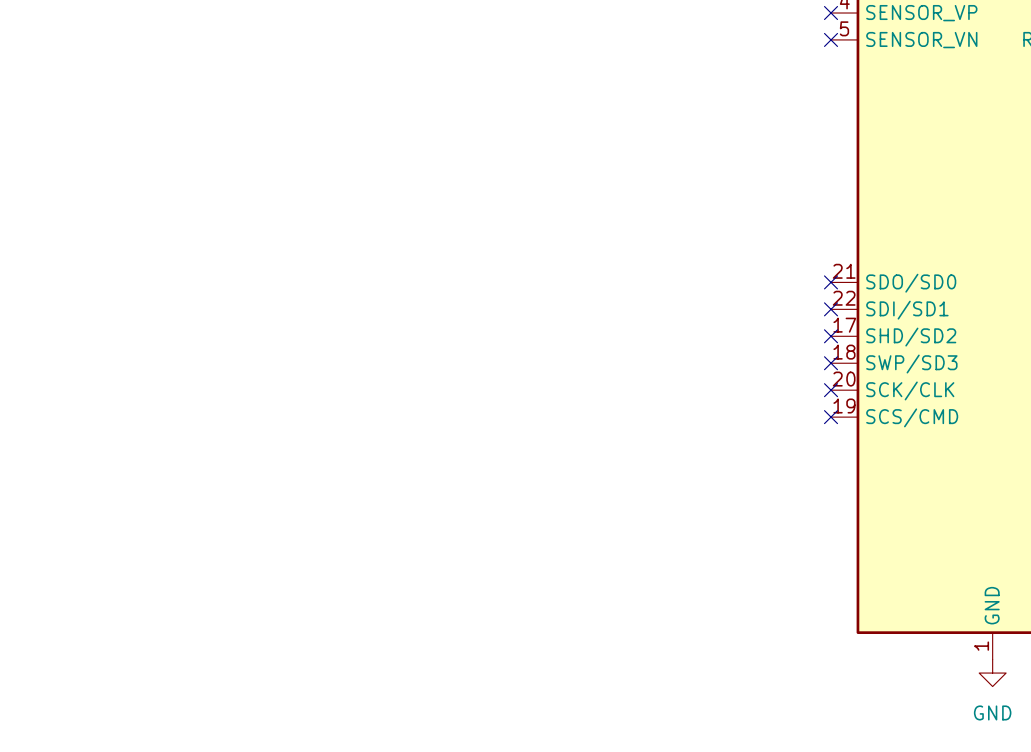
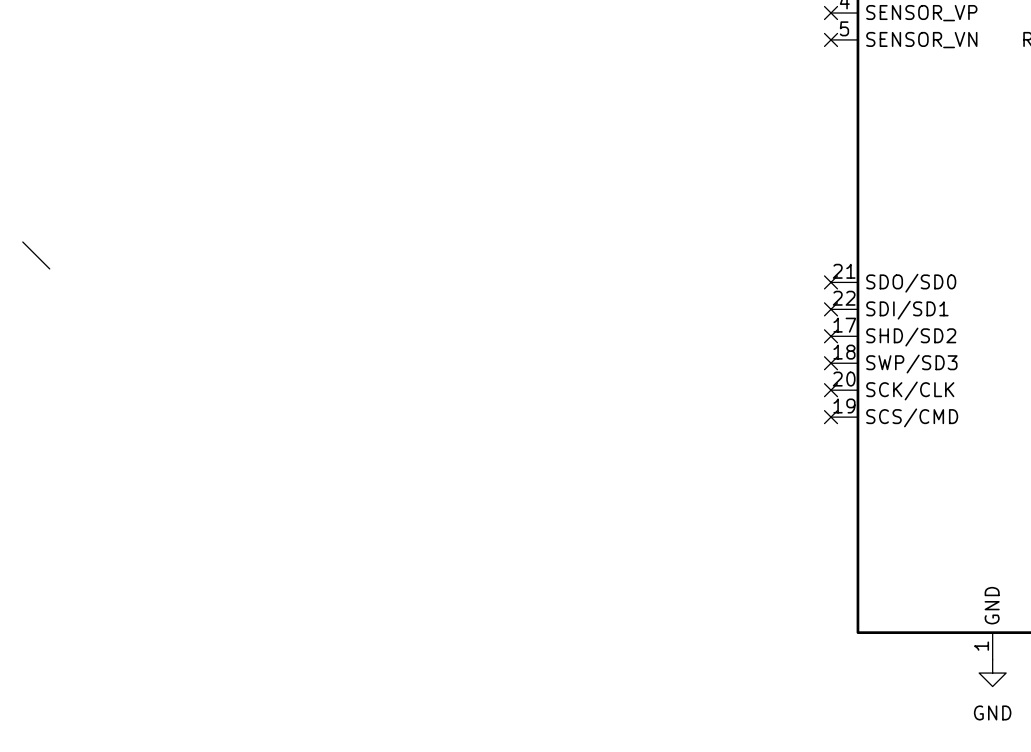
wire: none -> (22, 242) (49, 268)

